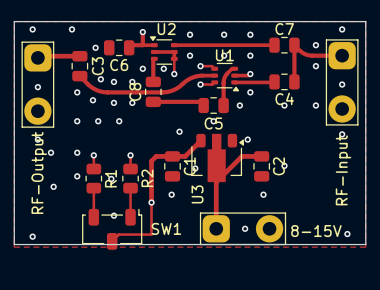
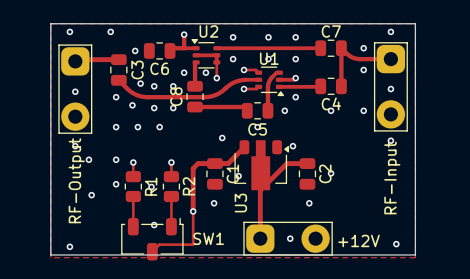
part value: 8-15V (316, 231) -> +12V (359, 240)

